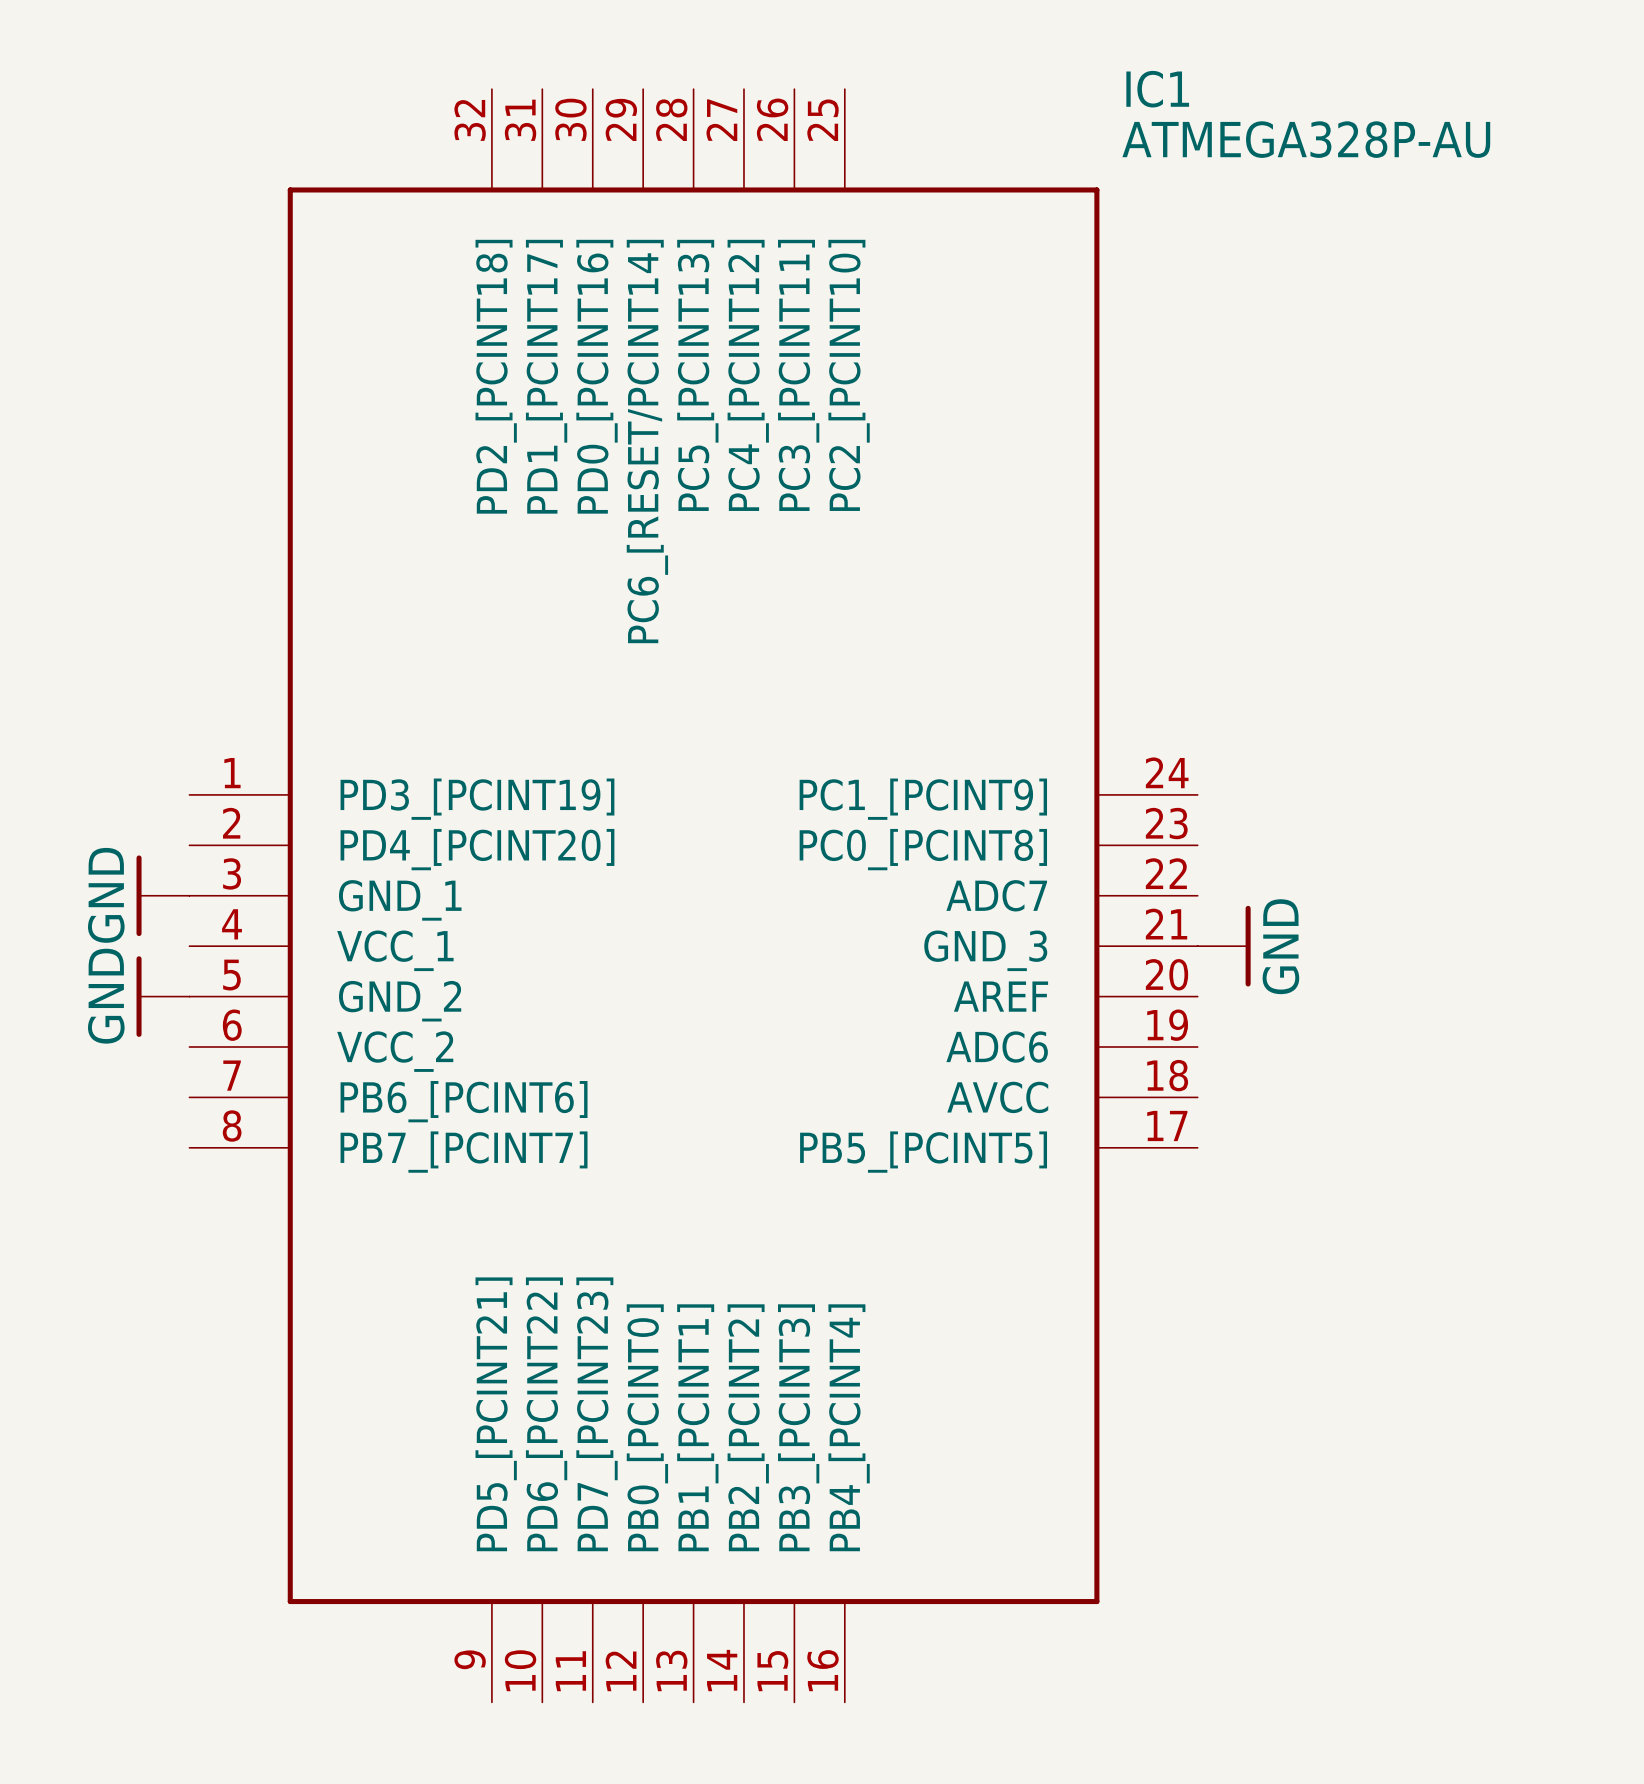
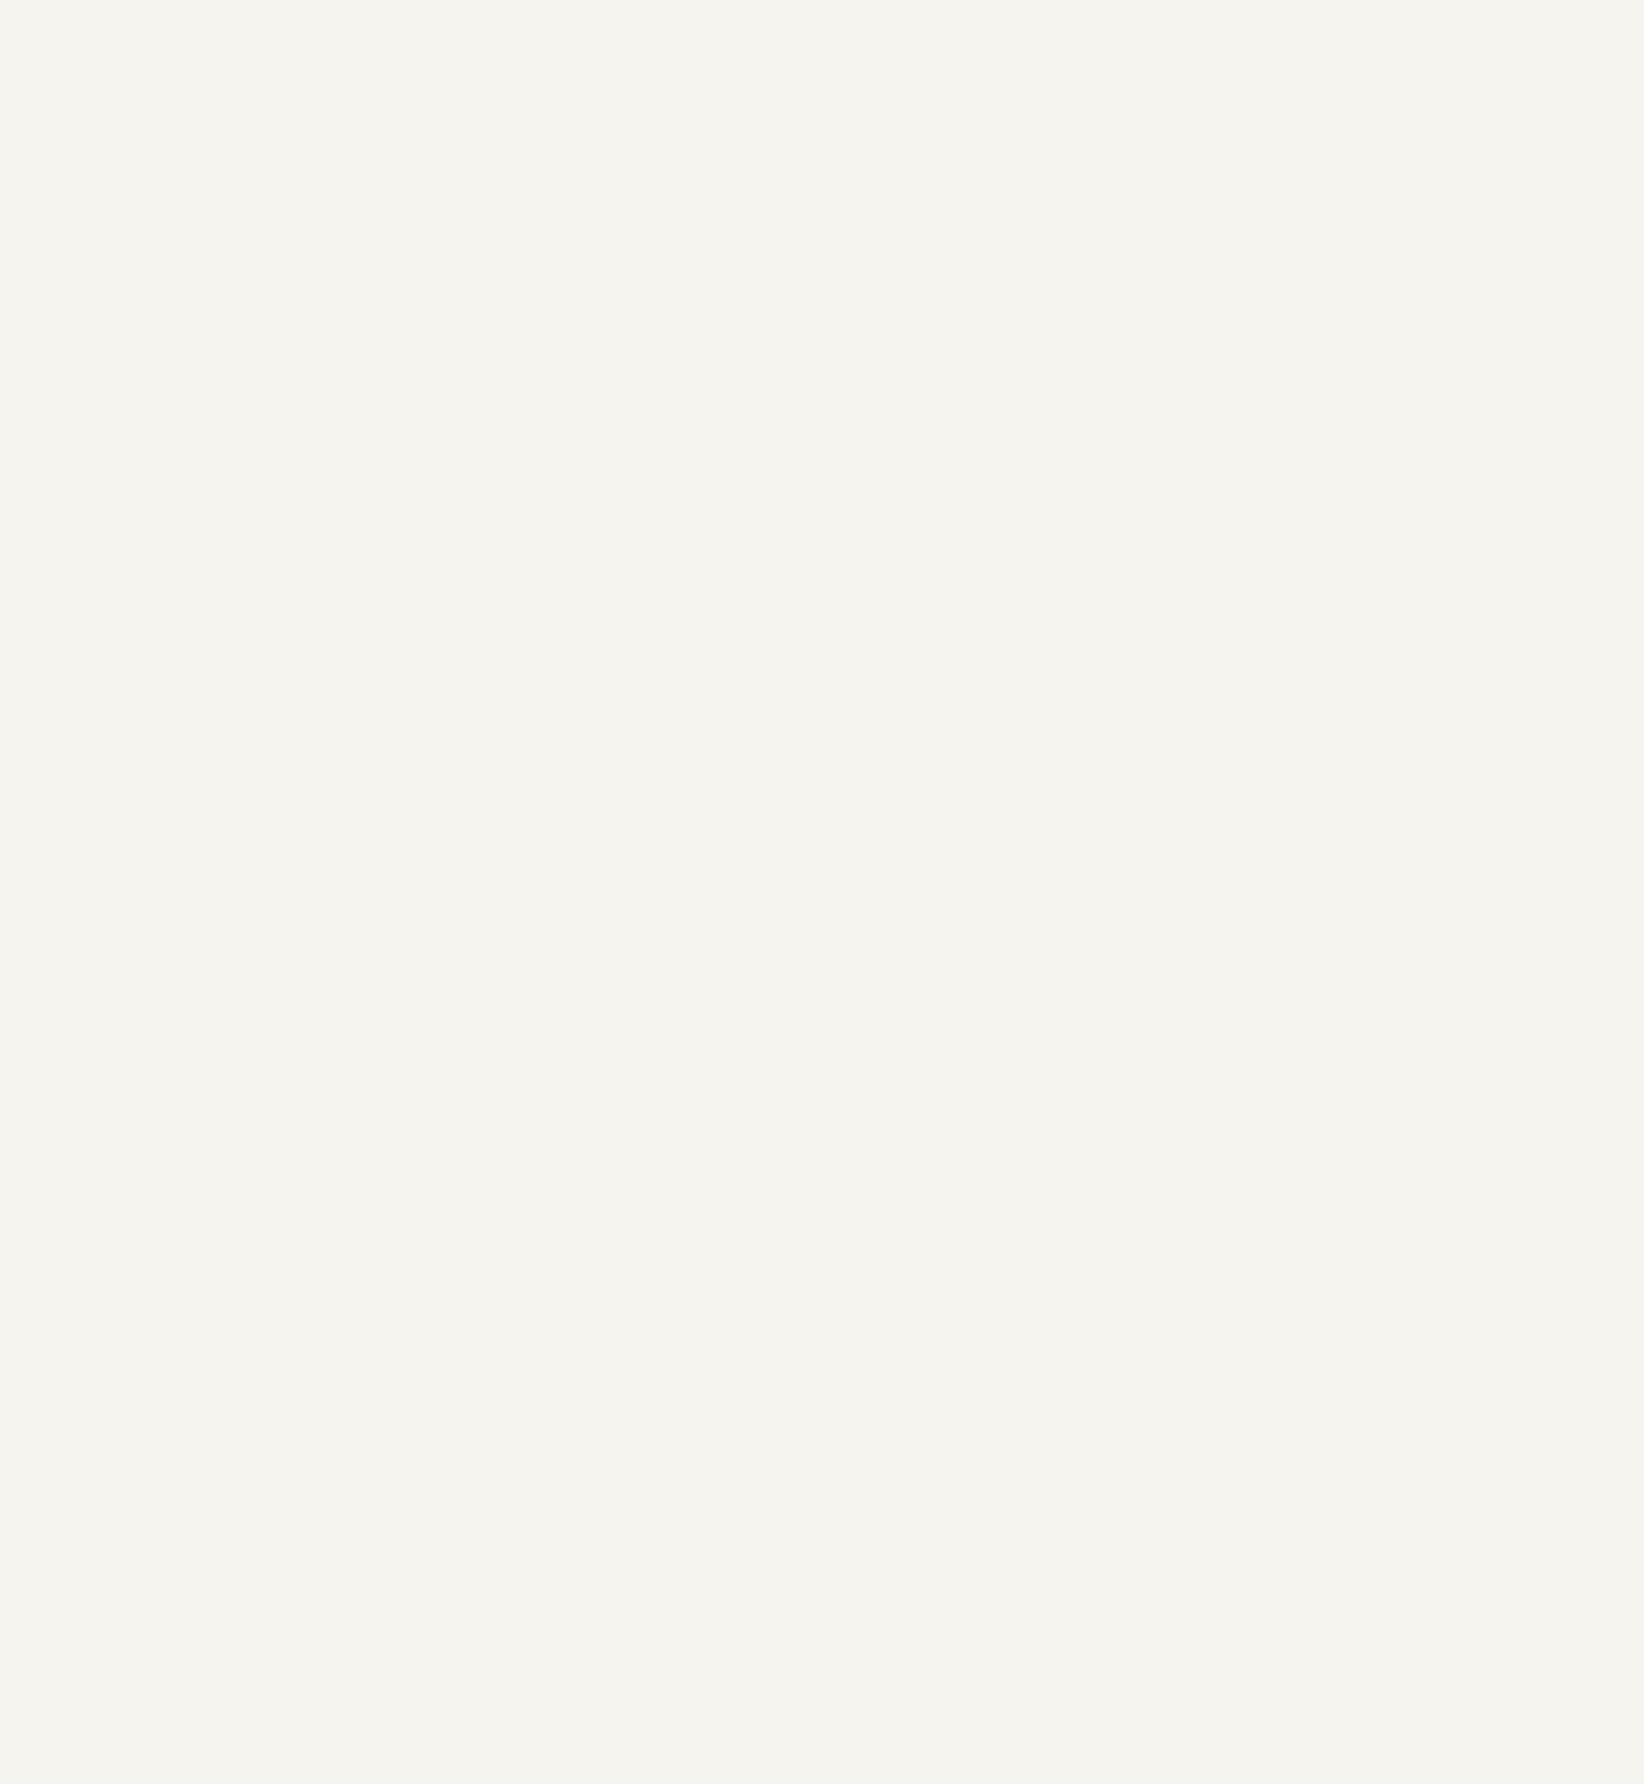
power symbol: GND (162, 895) -> none
IC1: ATMEGA328P-AU (693, 895) -> none
power symbol: GND (1224, 946) -> none
power symbol: GND (162, 996) -> none

